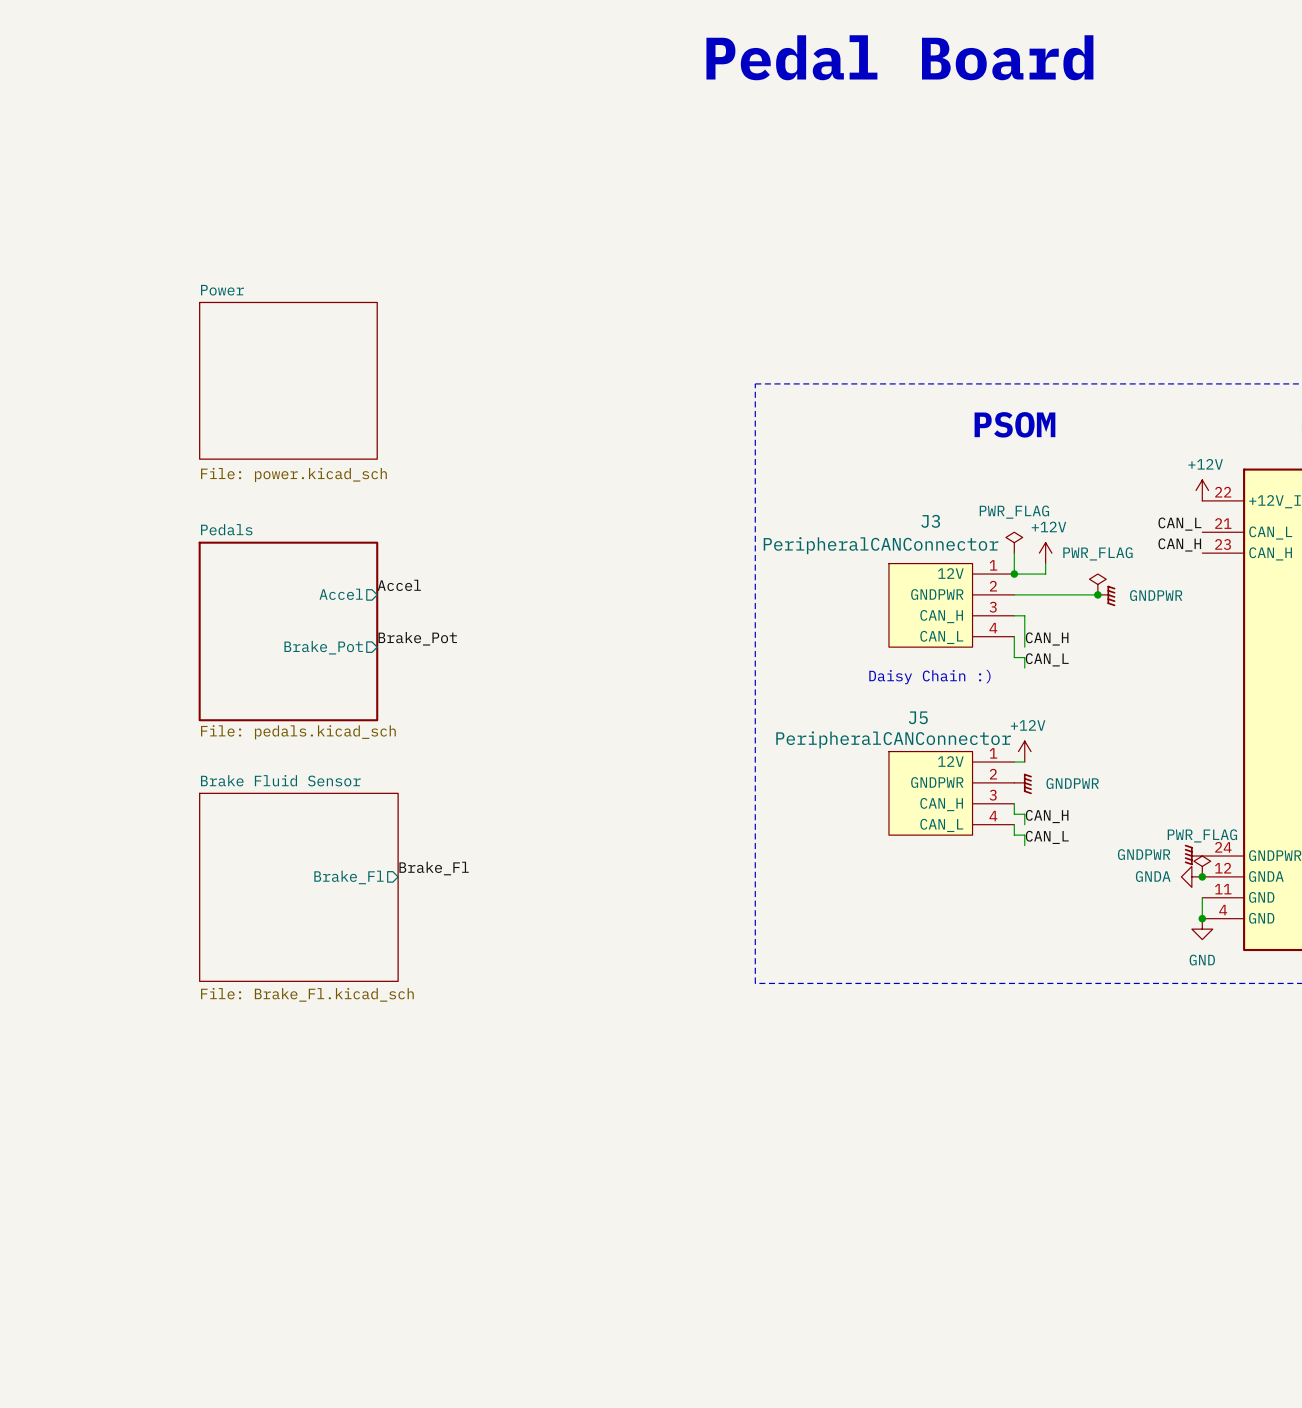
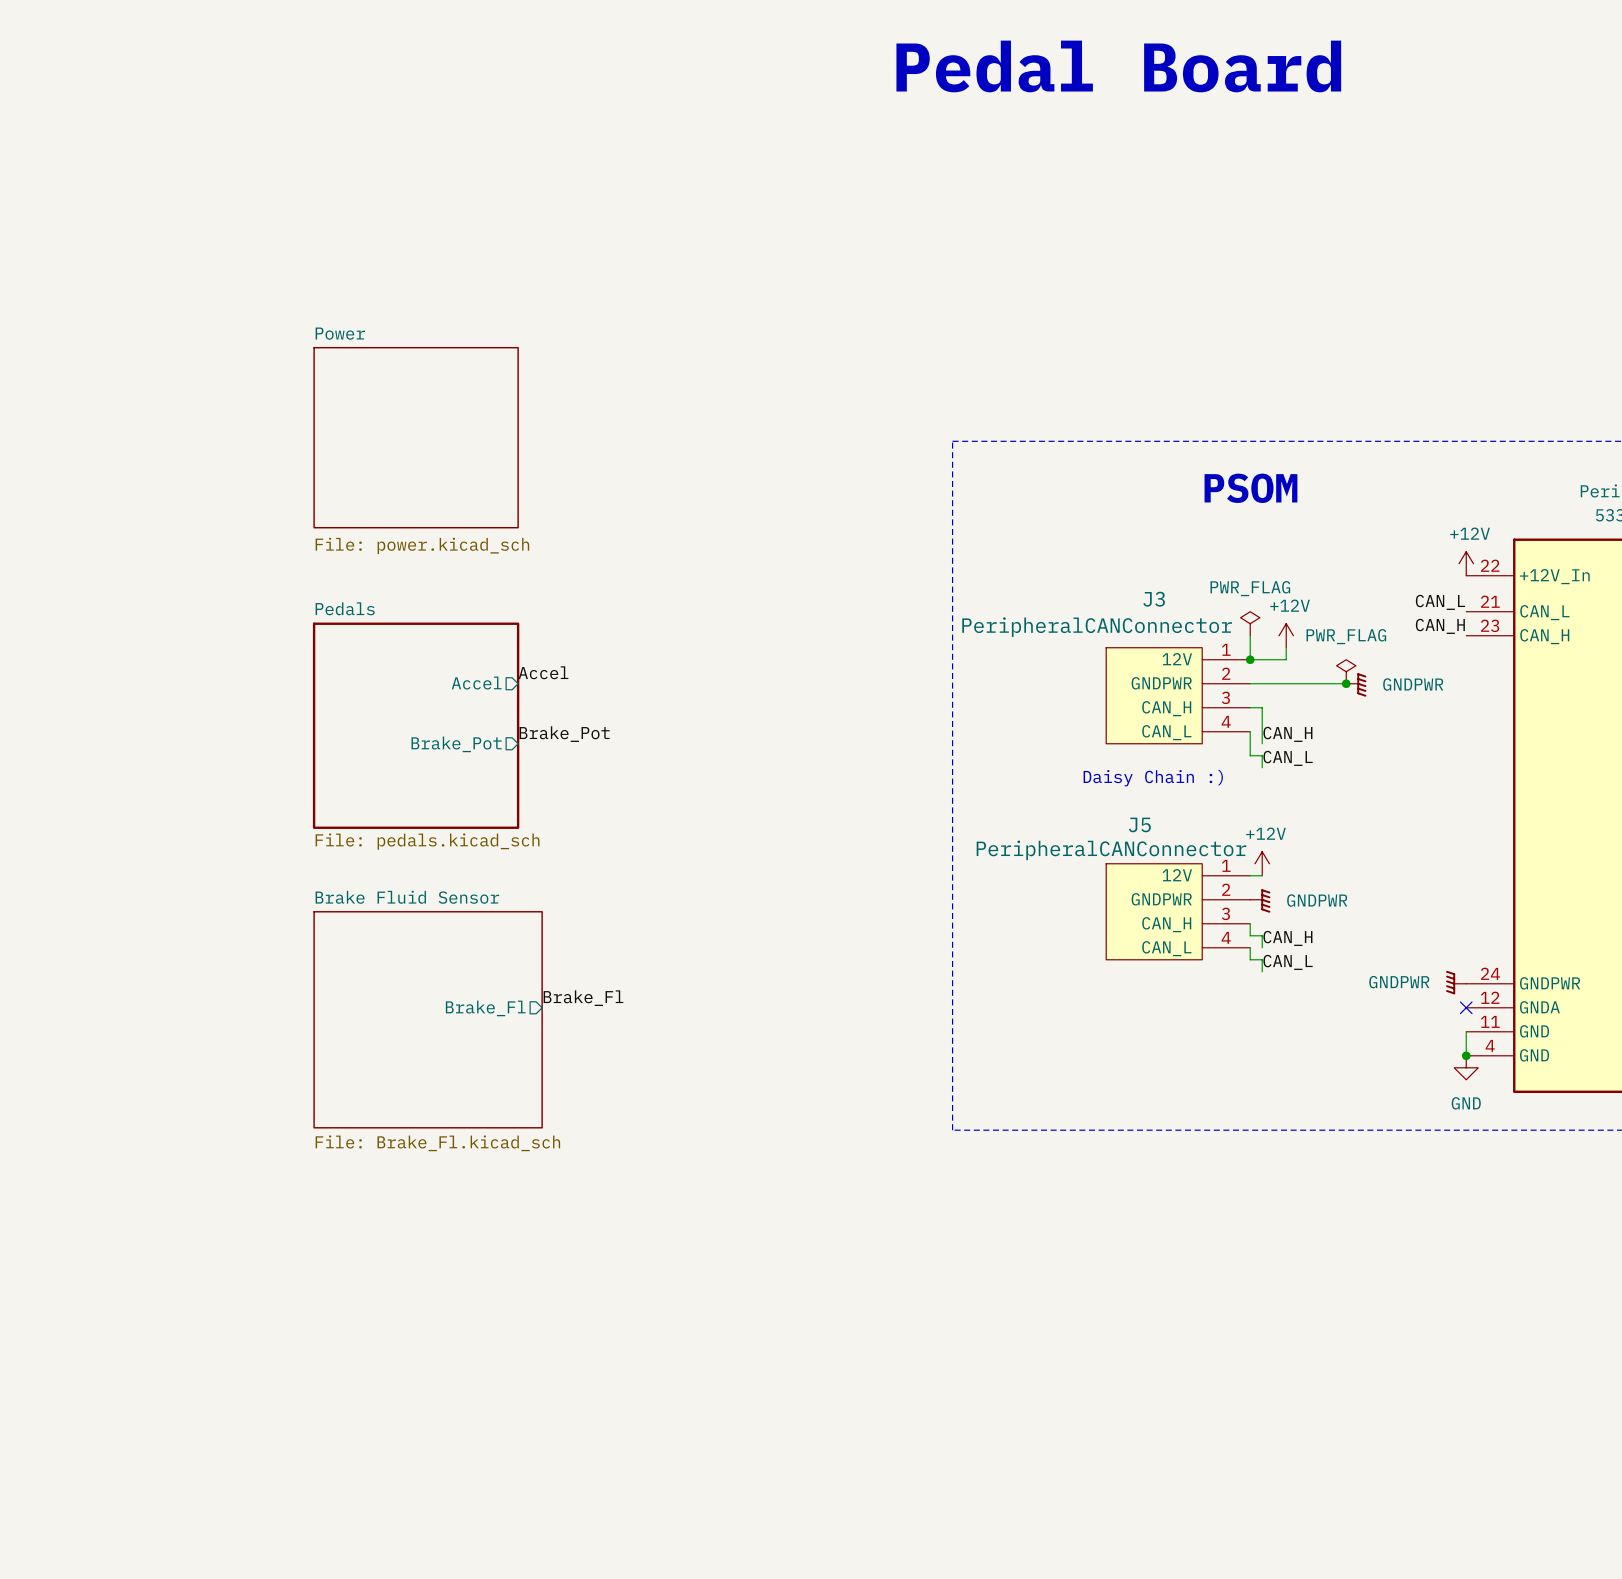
power symbol: PWR_FLAG (1202, 866) -> none
power symbol: GNDA (1191, 876) -> none
junction: (1202, 876) -> none
no-connect mark: none -> (1466, 1007)

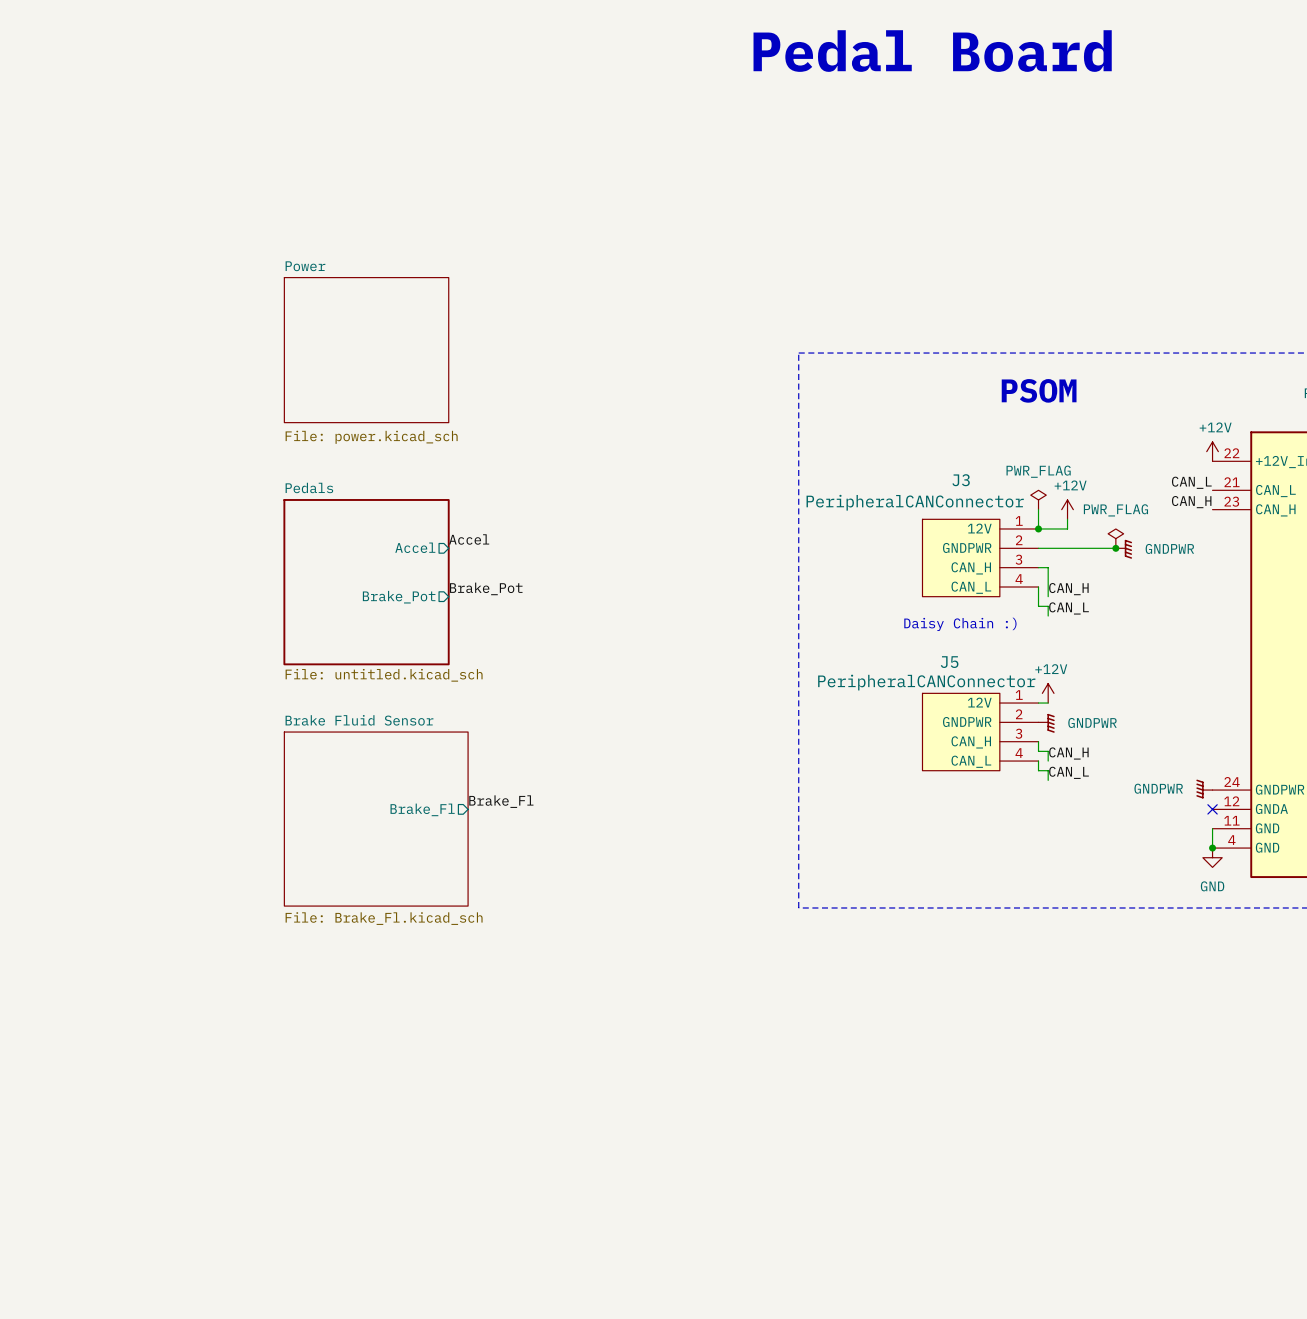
sheet Pedals value: File: pedals.kicad_sch (427, 841) -> File: untitled.kicad_sch (384, 675)

